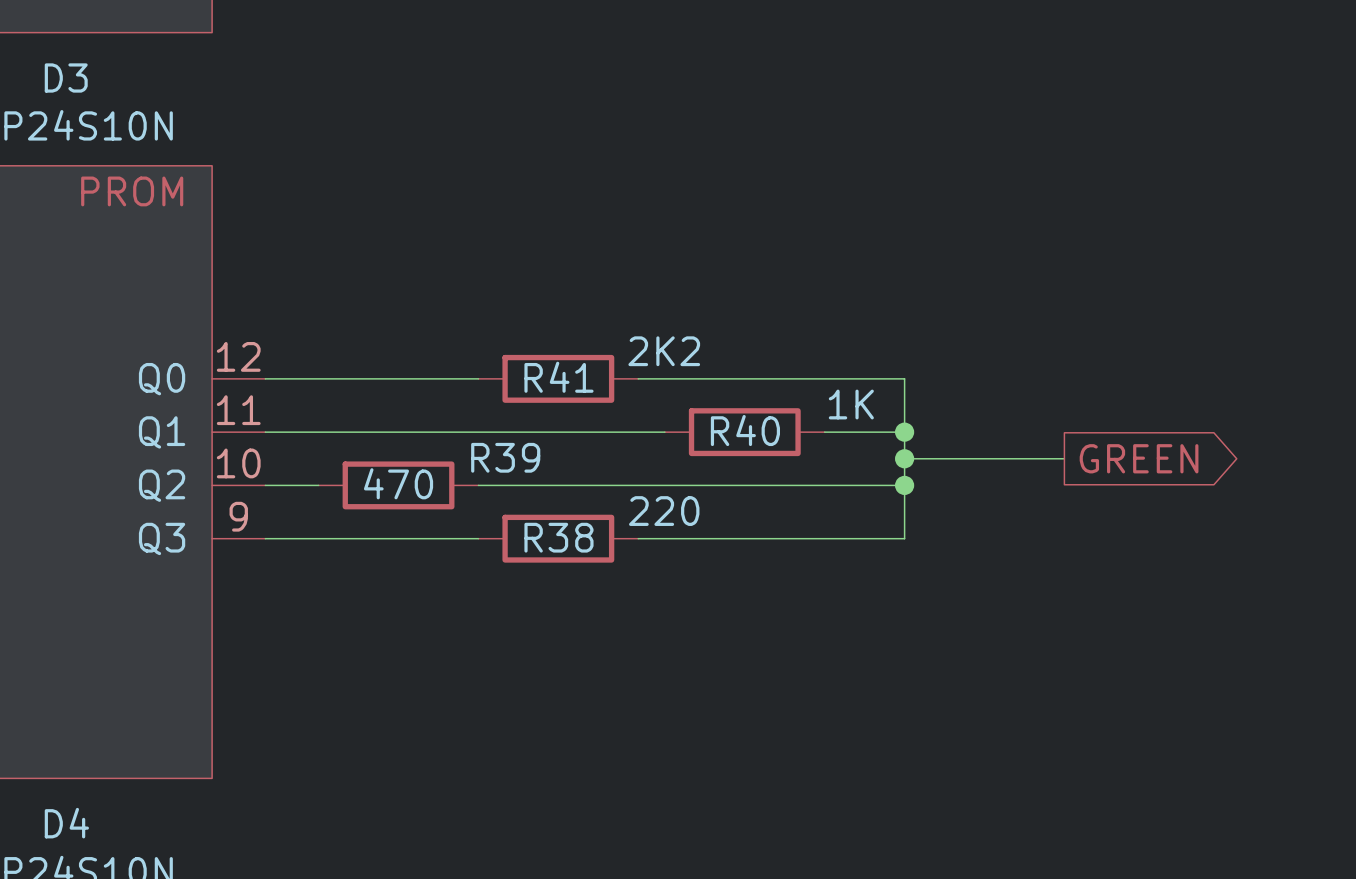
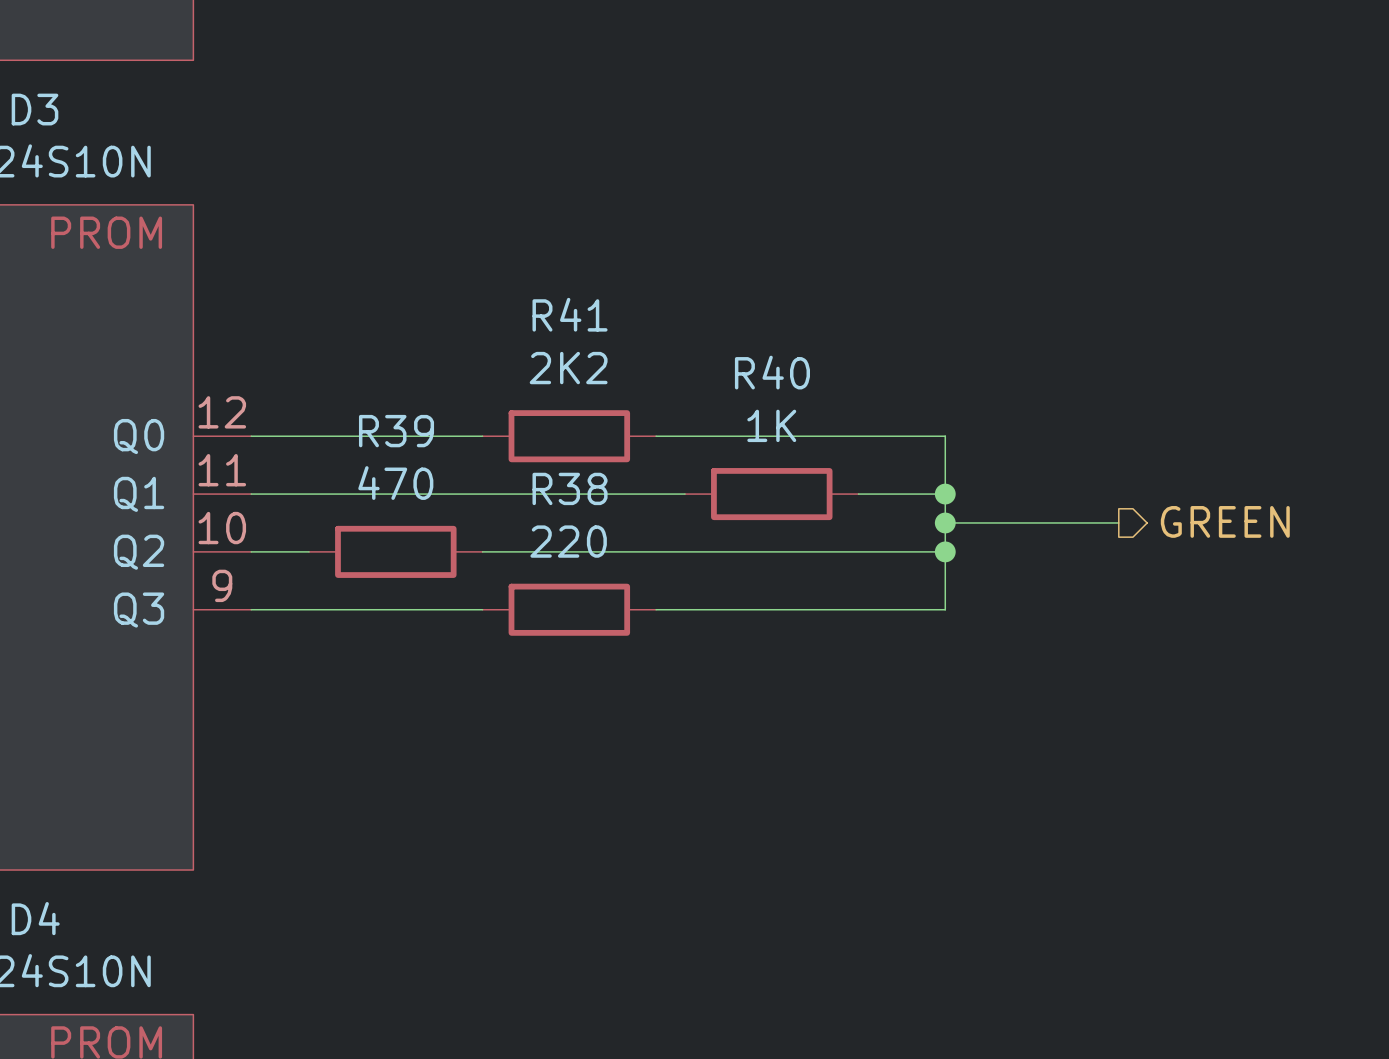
R41 value position: 2K2 (664, 351) -> 2K2 (568, 368)
R41 name position: R41 (558, 377) -> R41 (570, 314)
R40 value position: 1K (851, 404) -> 1K (771, 425)
R40 name position: R40 (745, 430) -> R40 (772, 372)
R39 name position: R39 (505, 457) -> R39 (396, 431)
hierarchical label: none -> GREEN (1225, 521)
global label: GREEN (1139, 458) -> none
R39 value position: 470 (398, 483) -> 470 (395, 483)
R38 value position: 220 (664, 511) -> 220 (568, 541)
R38 name position: R38 (558, 537) -> R38 (570, 488)

